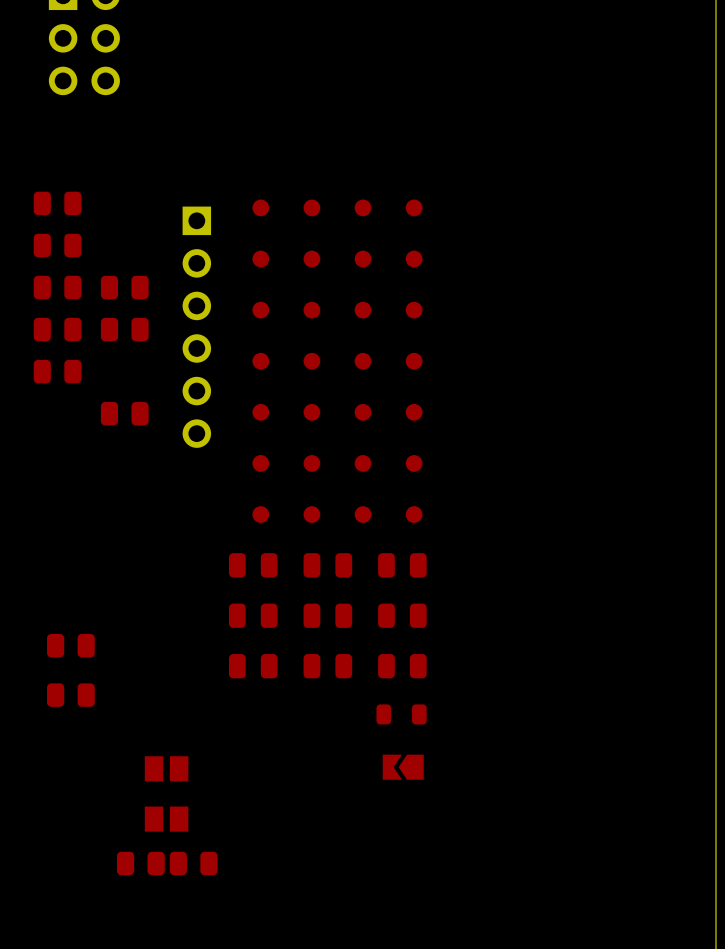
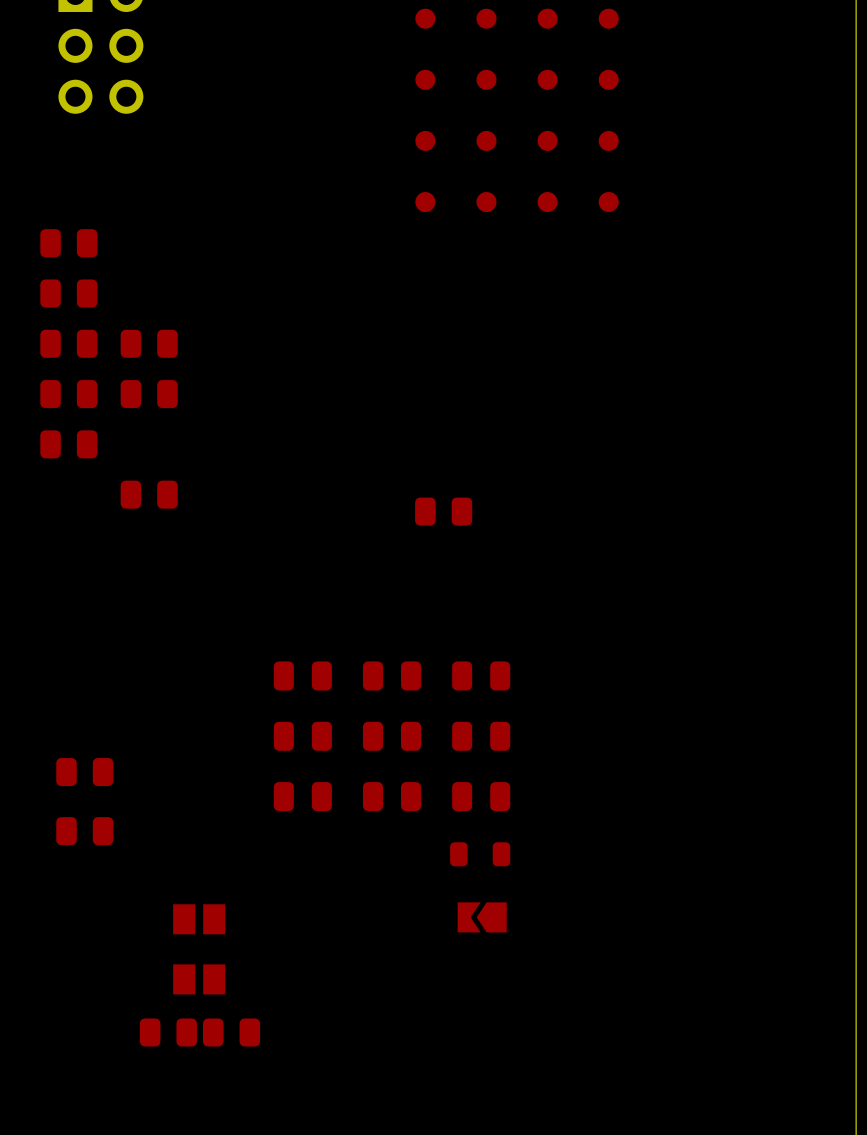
part: none -> (425, 18)
part: none -> (486, 18)
part: none -> (547, 18)
part: none -> (608, 18)
part: none -> (425, 79)
part: none -> (486, 79)
part: none -> (547, 79)
part: none -> (608, 79)
part: none -> (425, 140)
part: none -> (486, 140)
part: none -> (547, 140)
part: none -> (608, 140)
part: none -> (425, 202)
part: none -> (486, 202)
part: none -> (547, 202)
part: none -> (608, 202)
part: (260, 207) -> none
part: (311, 207) -> none
part: (363, 207) -> none
part: (414, 207) -> none
part: (260, 259) -> none
part: (311, 259) -> none
part: (363, 259) -> none
part: (414, 259) -> none
part: (260, 310) -> none
part: (311, 310) -> none
part: (363, 310) -> none
part: (414, 310) -> none
part: (196, 327) -> none
part: (260, 361) -> none
part: (311, 361) -> none
part: (363, 361) -> none
part: (414, 361) -> none
part: (260, 412) -> none
part: (311, 412) -> none
part: (363, 412) -> none
part: (414, 412) -> none
part: none -> (443, 511)
part: (260, 463) -> none
part: (311, 463) -> none
part: (363, 463) -> none
part: (414, 463) -> none
part: (260, 514) -> none
part: (311, 514) -> none
part: (363, 514) -> none
part: (414, 514) -> none

